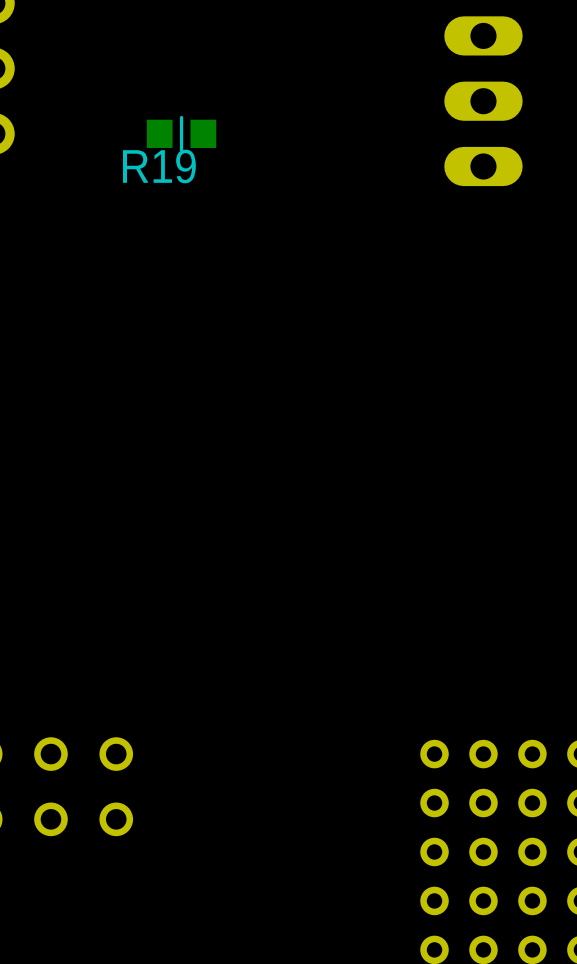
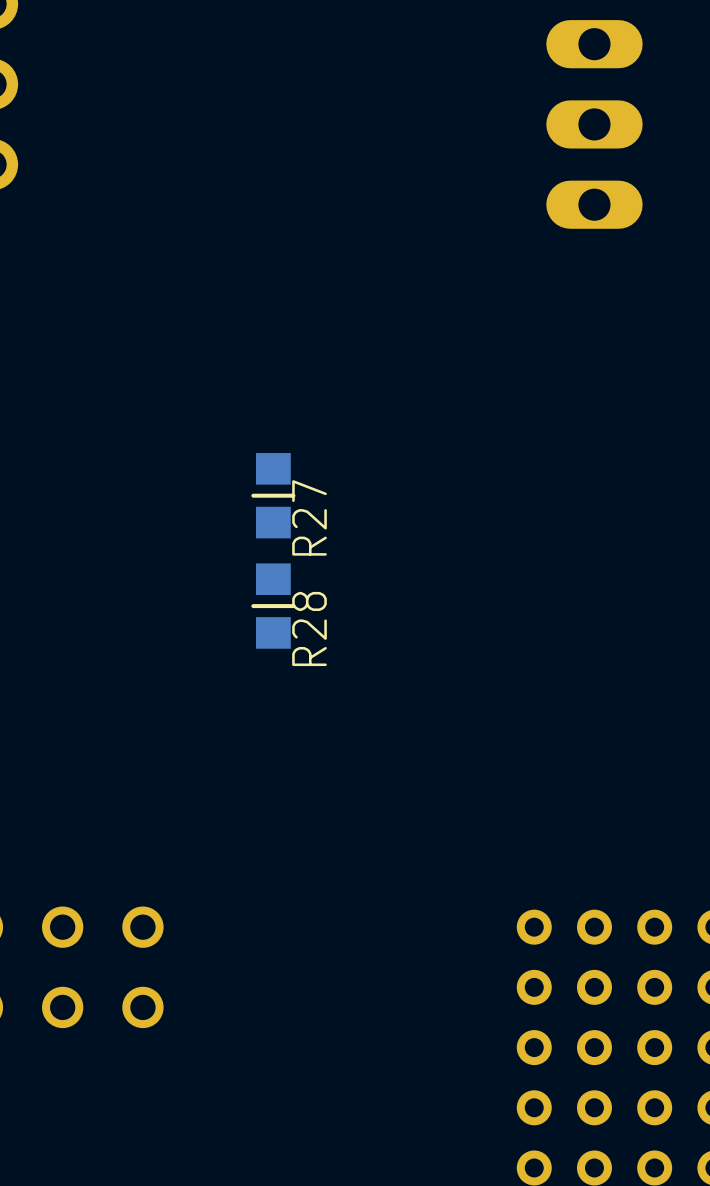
R19: (181, 133) -> none
R27: none -> (273, 495)
R28: none -> (273, 606)

